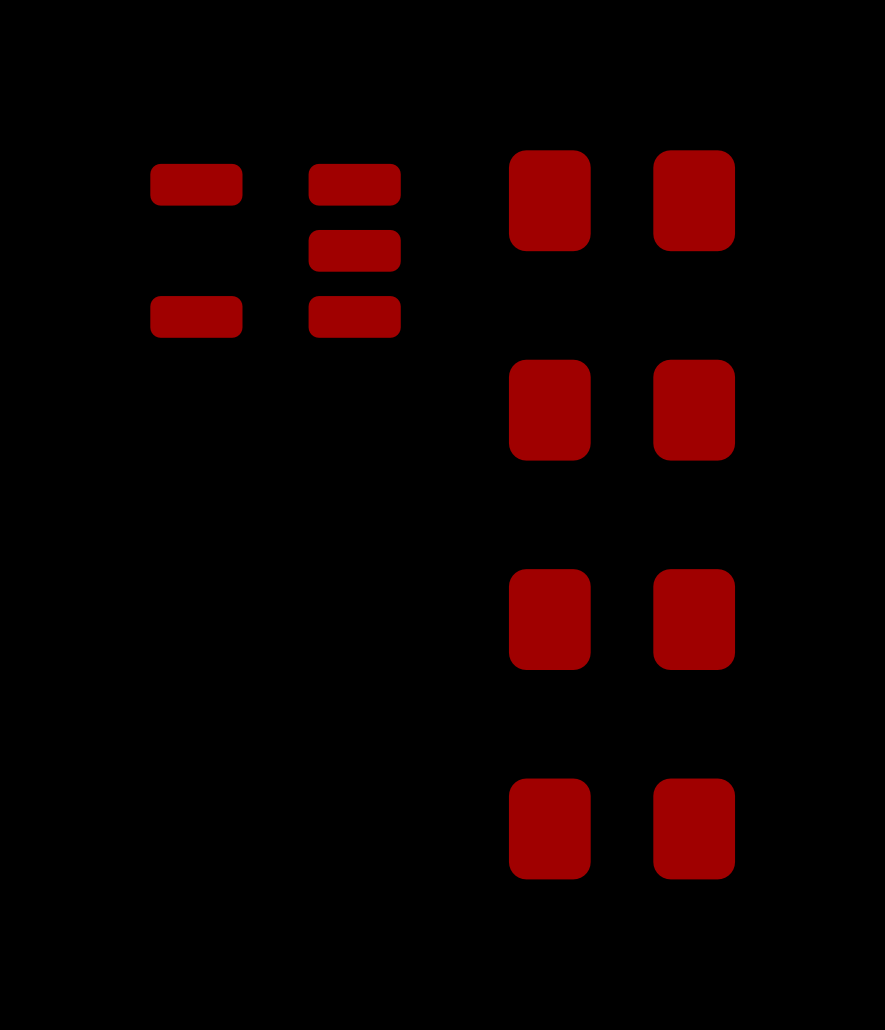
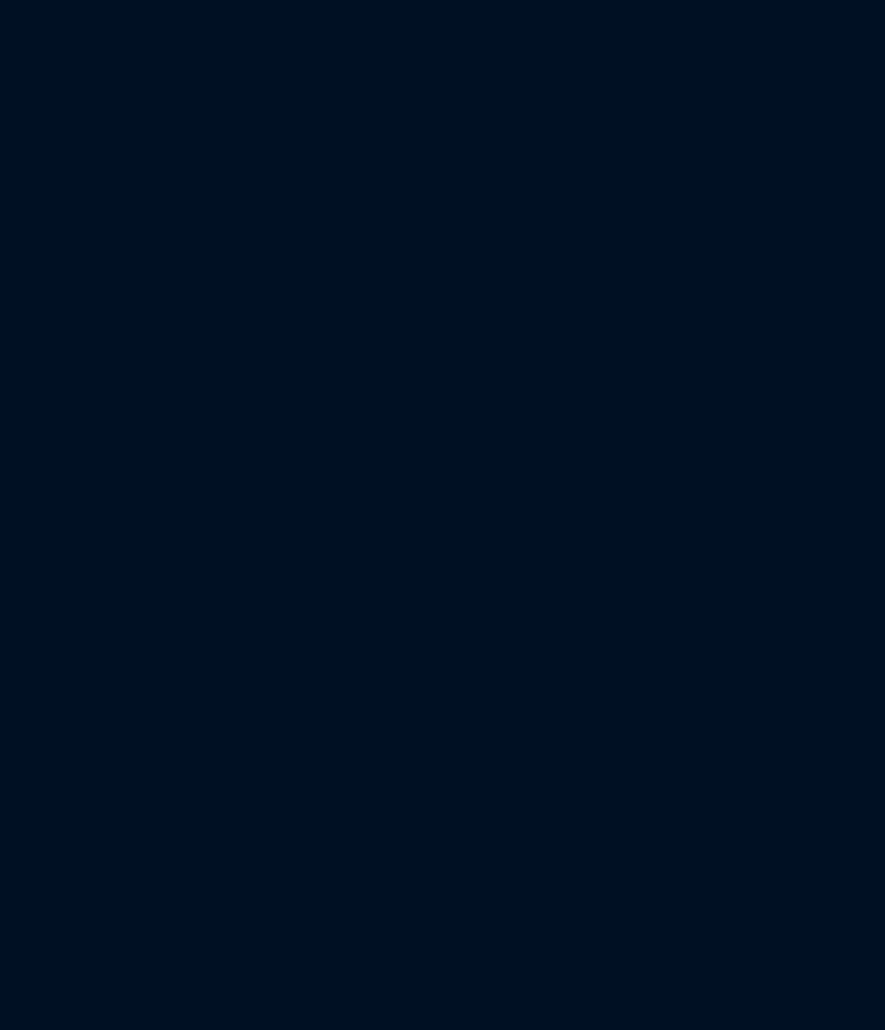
part: (622, 200) -> none
part: (275, 250) -> none
part: (622, 410) -> none
part: (622, 619) -> none
part: (622, 828) -> none

